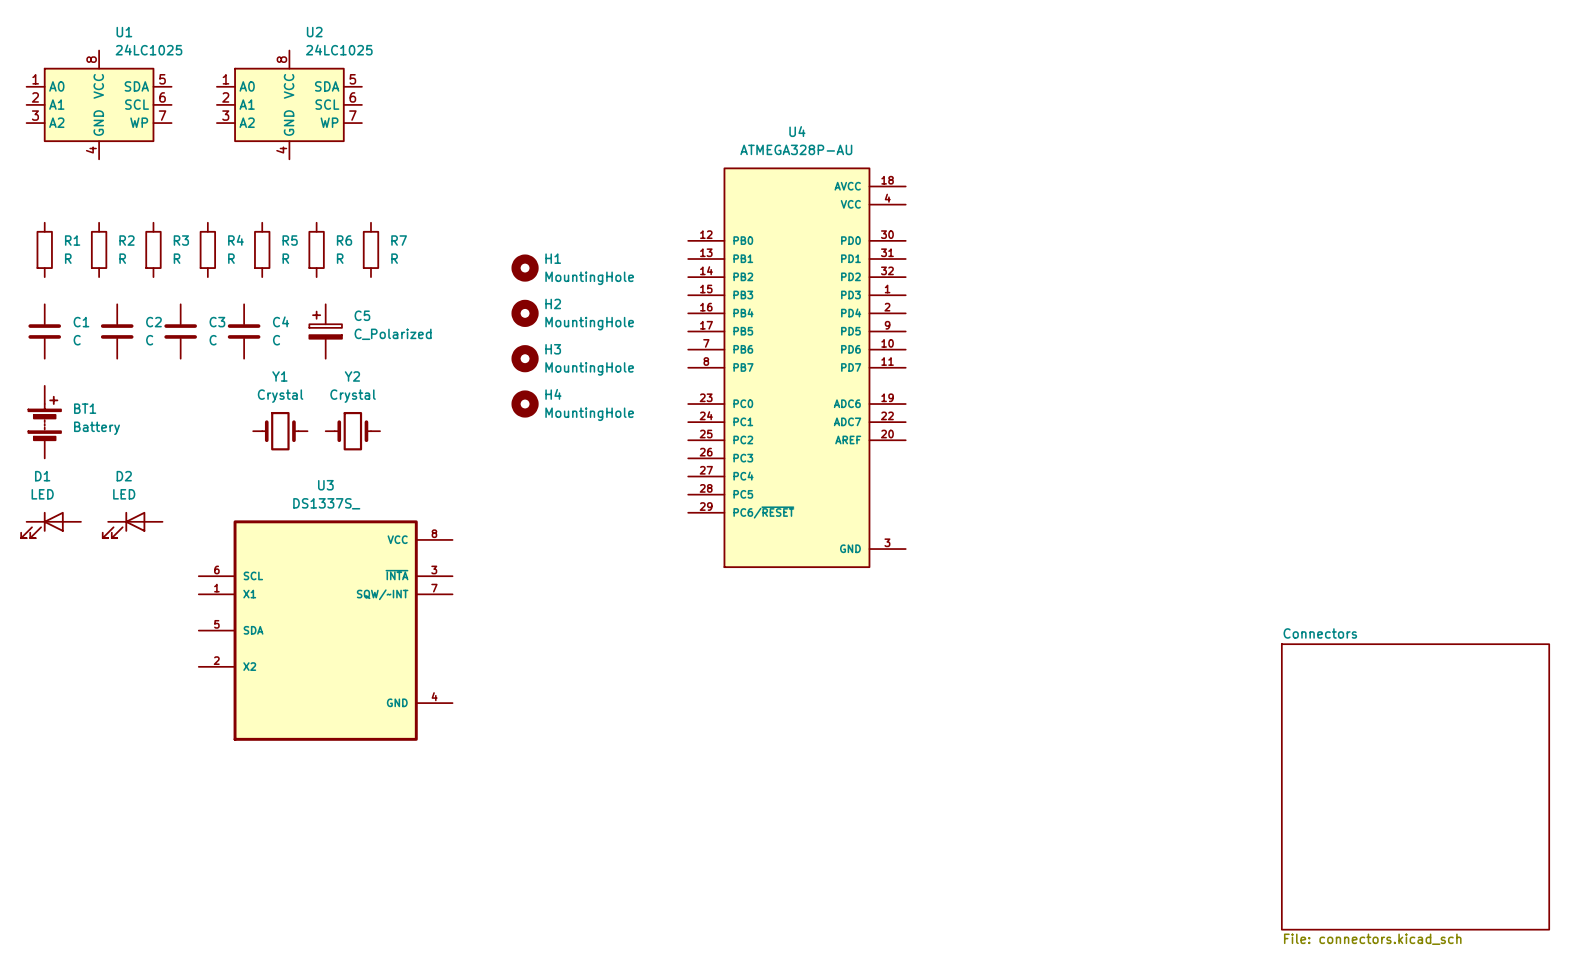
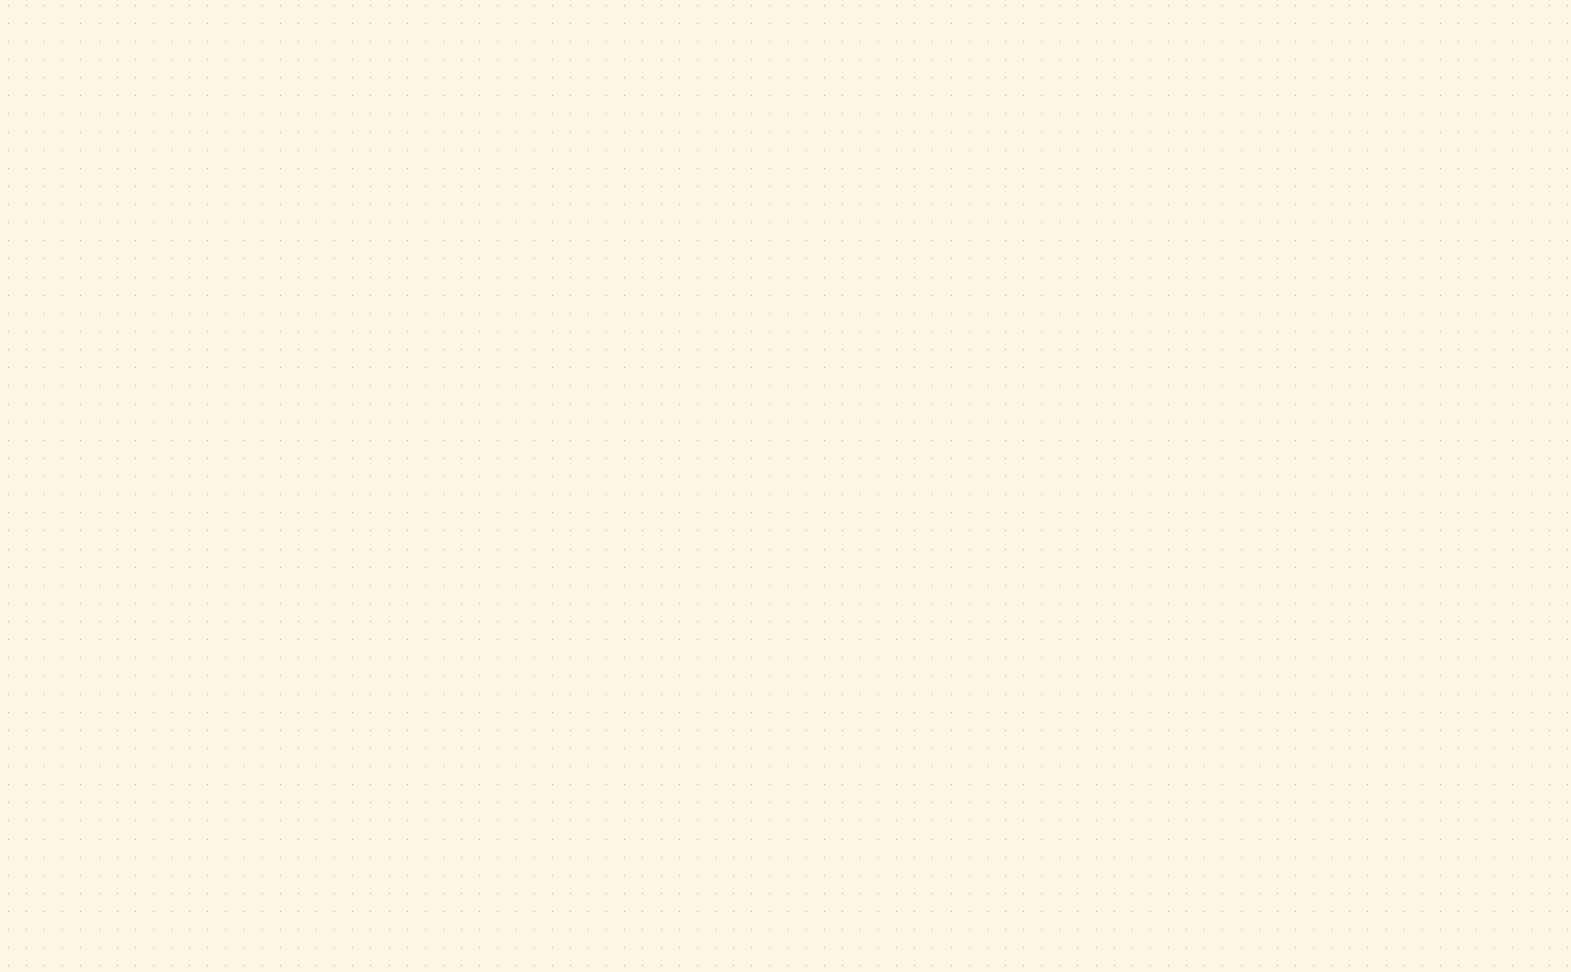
U1: 24LC1025 (99, 104) -> none
U2: 24LC1025 (289, 104) -> none
R1: R (44, 249) -> none
R2: R (99, 249) -> none
R3: R (153, 249) -> none
R4: R (207, 249) -> none
R5: R (262, 249) -> none
R6: R (316, 249) -> none
R7: R (370, 249) -> none
H1: MountingHole (525, 268) -> none
H2: MountingHole (525, 313) -> none
C1: C (44, 331) -> none
C2: C (117, 331) -> none
C3: C (180, 331) -> none
C4: C (244, 331) -> none
C5: C_Polarized (325, 331) -> none
H3: MountingHole (525, 358) -> none
U4: ATMEGA328P-AU (796, 367) -> none
H4: MountingHole (525, 404) -> none
BT1: Battery (44, 422) -> none
Y1: Crystal (280, 431) -> none
Y2: Crystal (352, 431) -> none
D1: LED (51, 525) -> none
D2: LED (132, 525) -> none
U3: DS1337S_ (325, 630) -> none
sheet Connectors: File: connectors.kicad_sch (1415, 786) -> none

